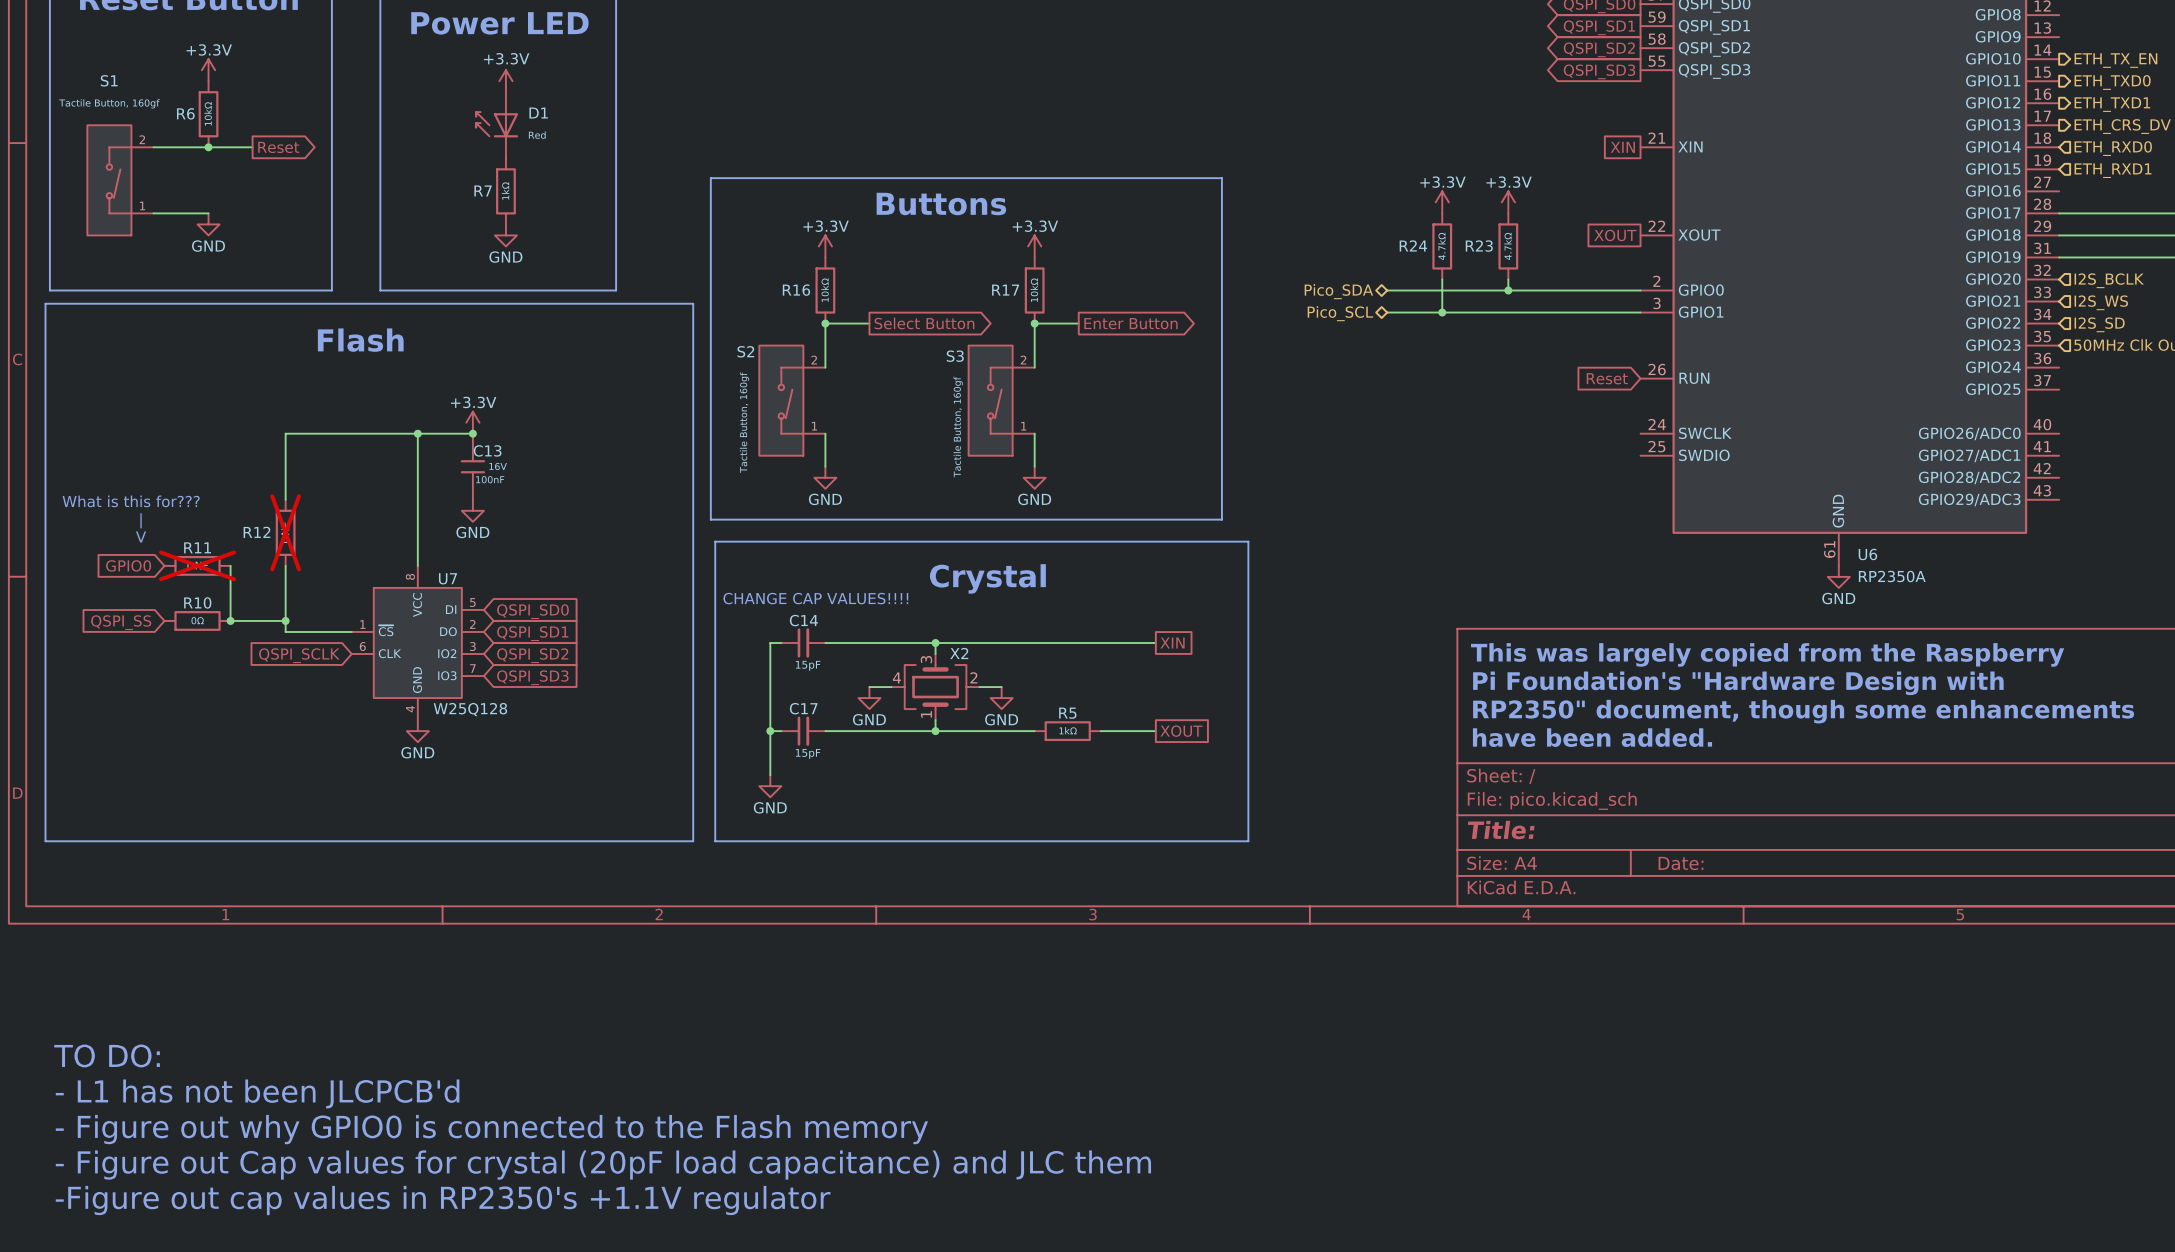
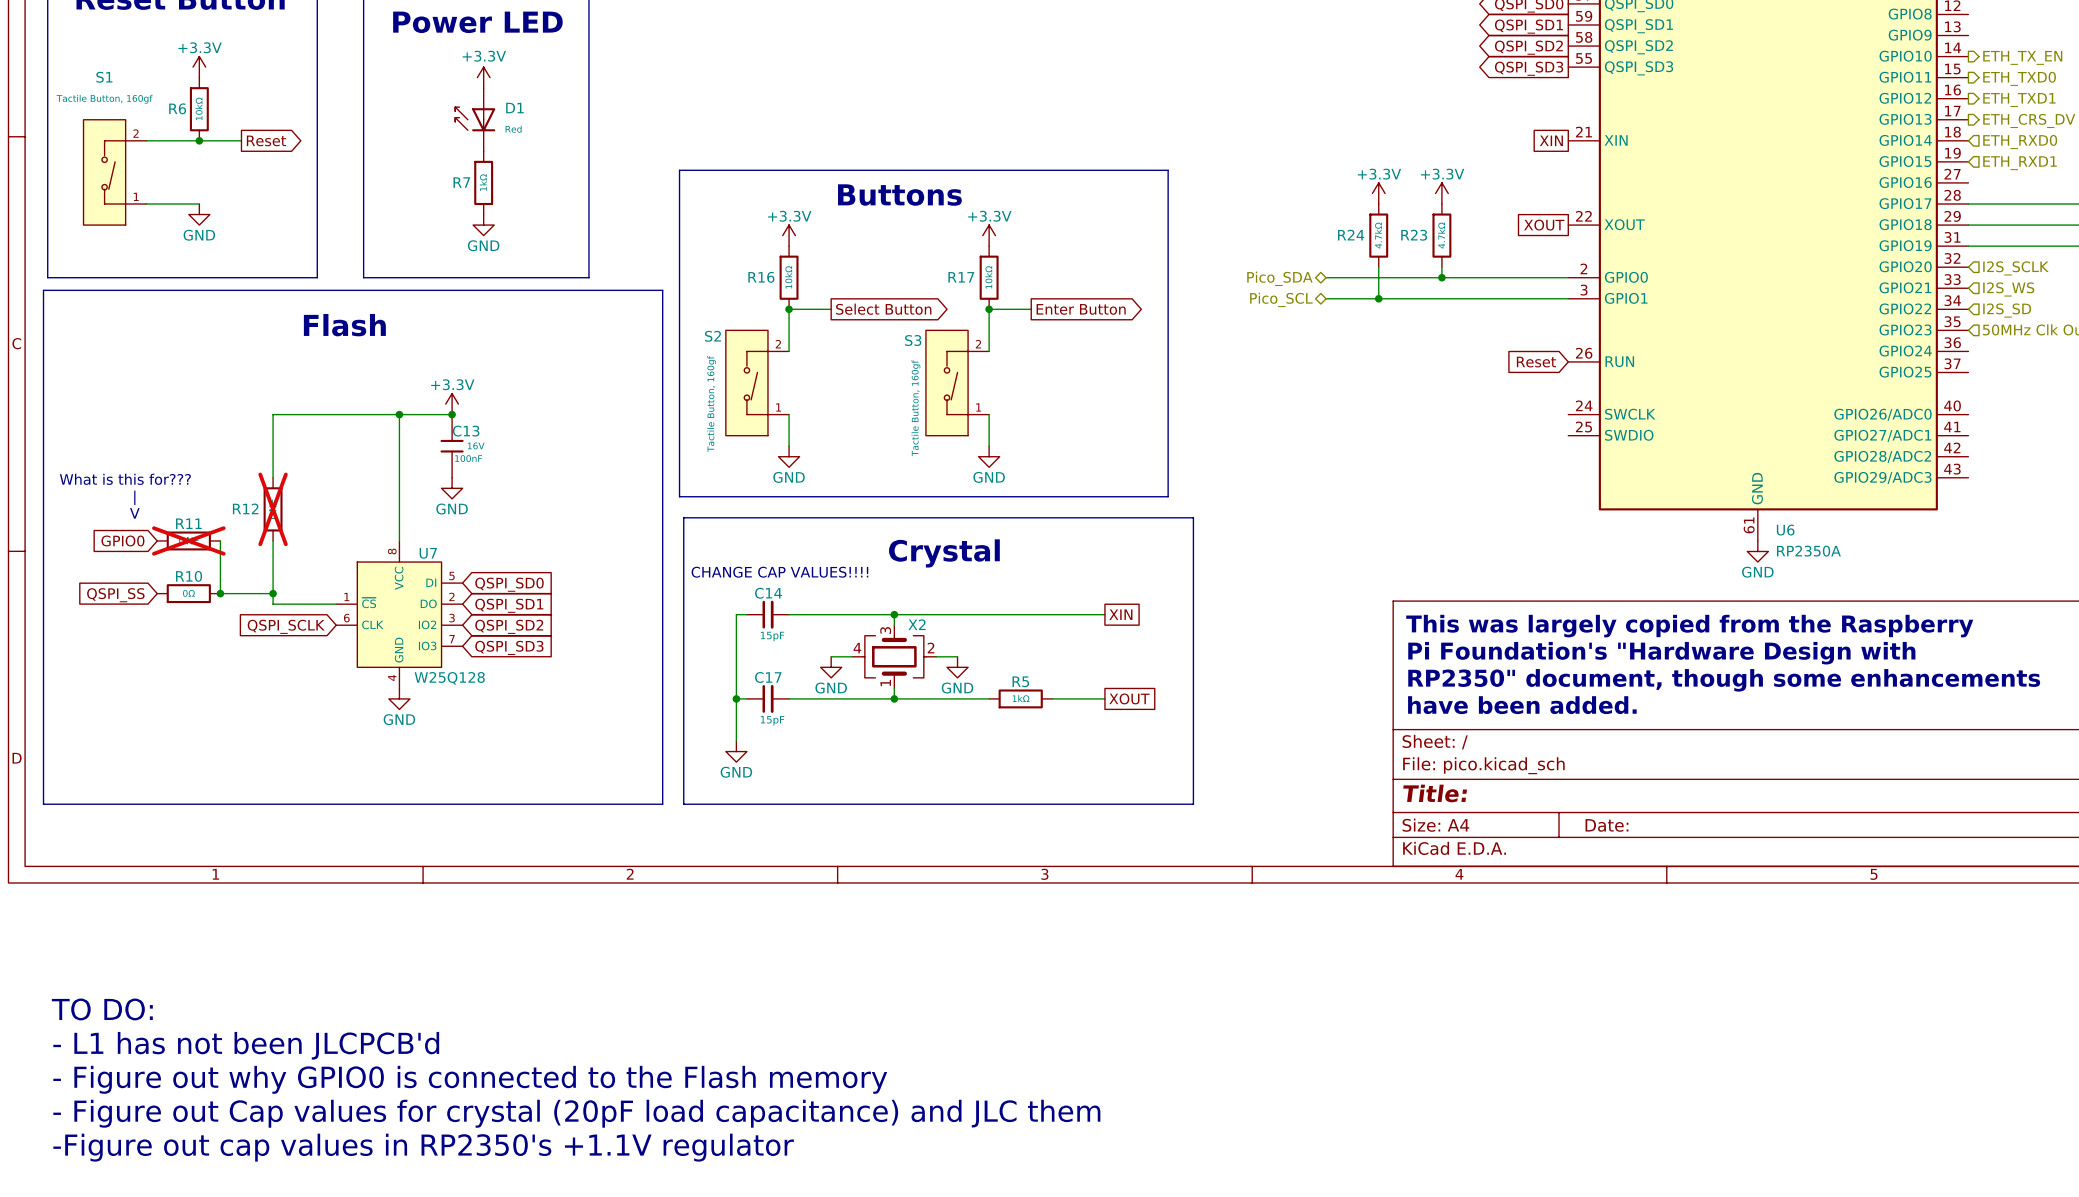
hierarchical label: I2S_BCLK (2109, 280) -> I2S_SCLK (2015, 268)

